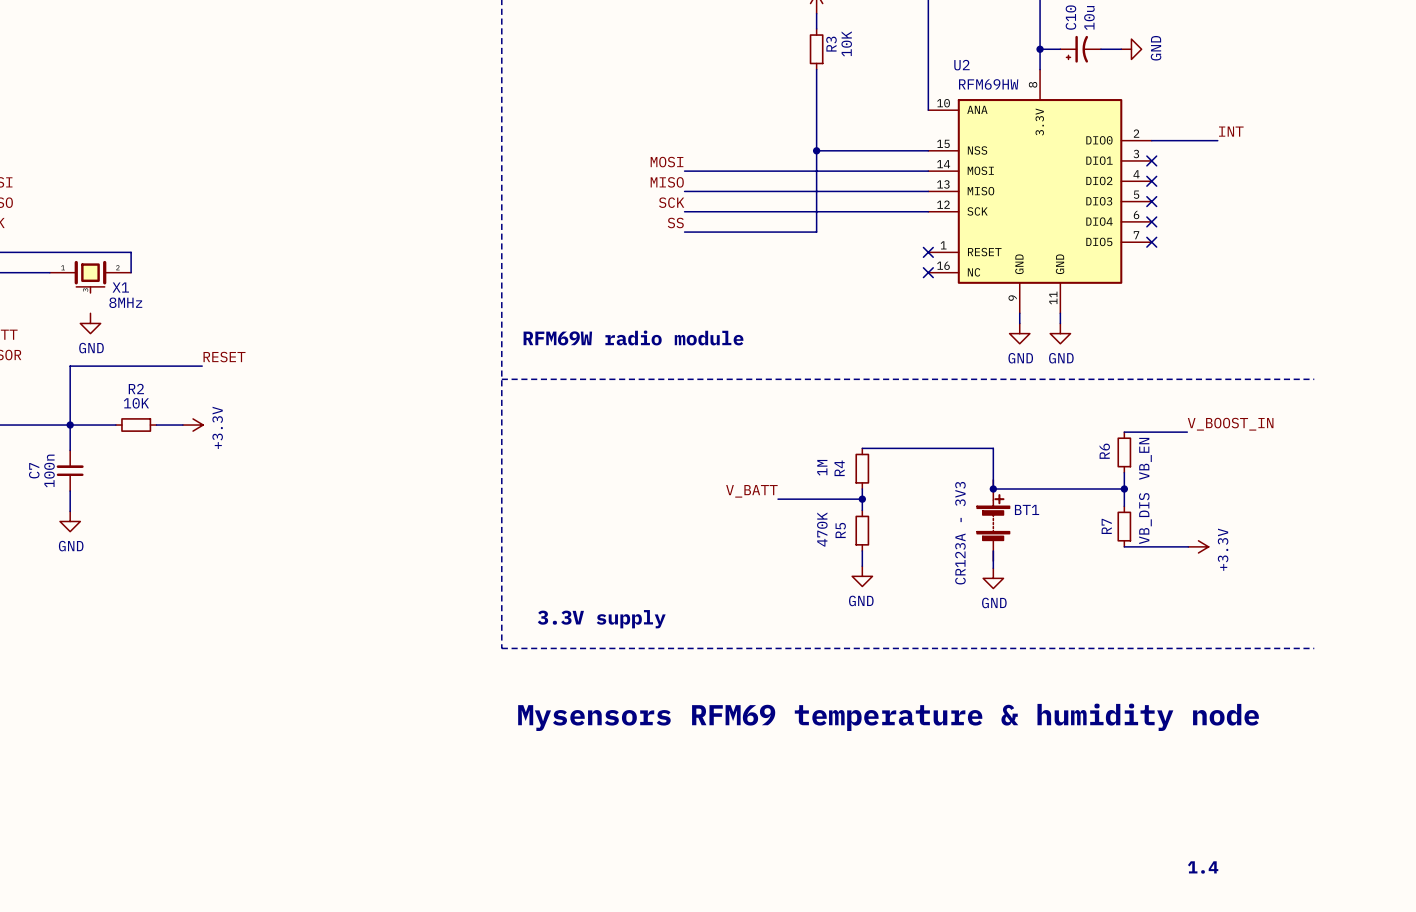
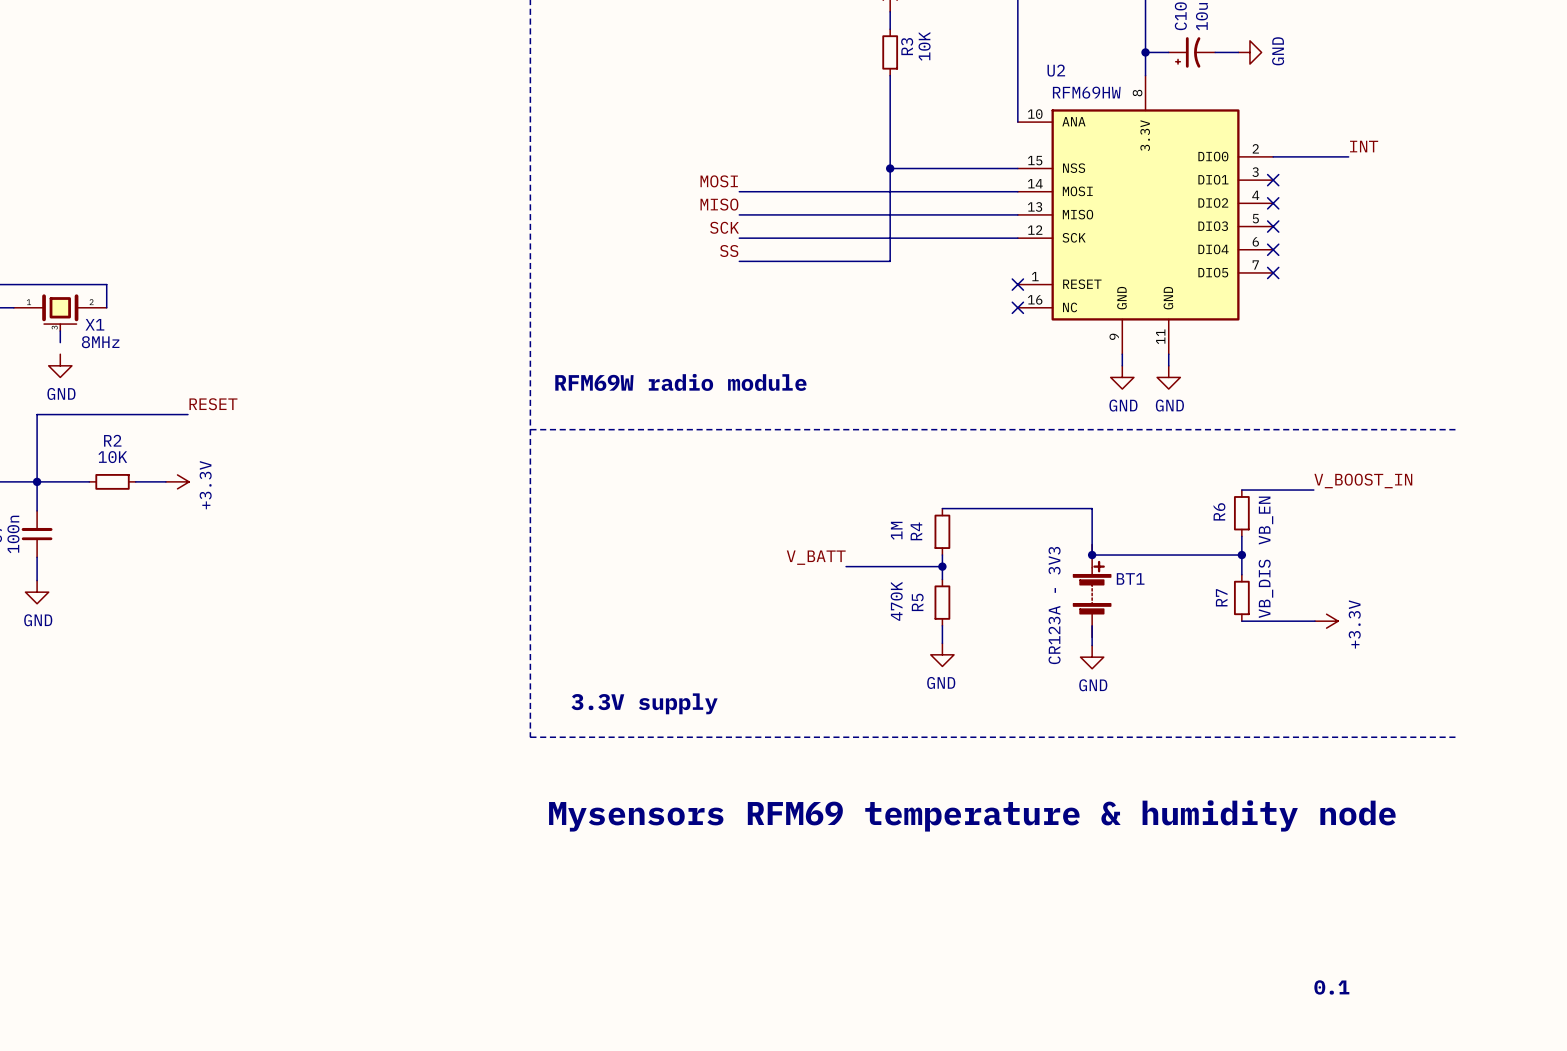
wire: none -> (60, 331) (60, 342)
text: 1.4 (1203, 867) -> 0.1 (1331, 987)

